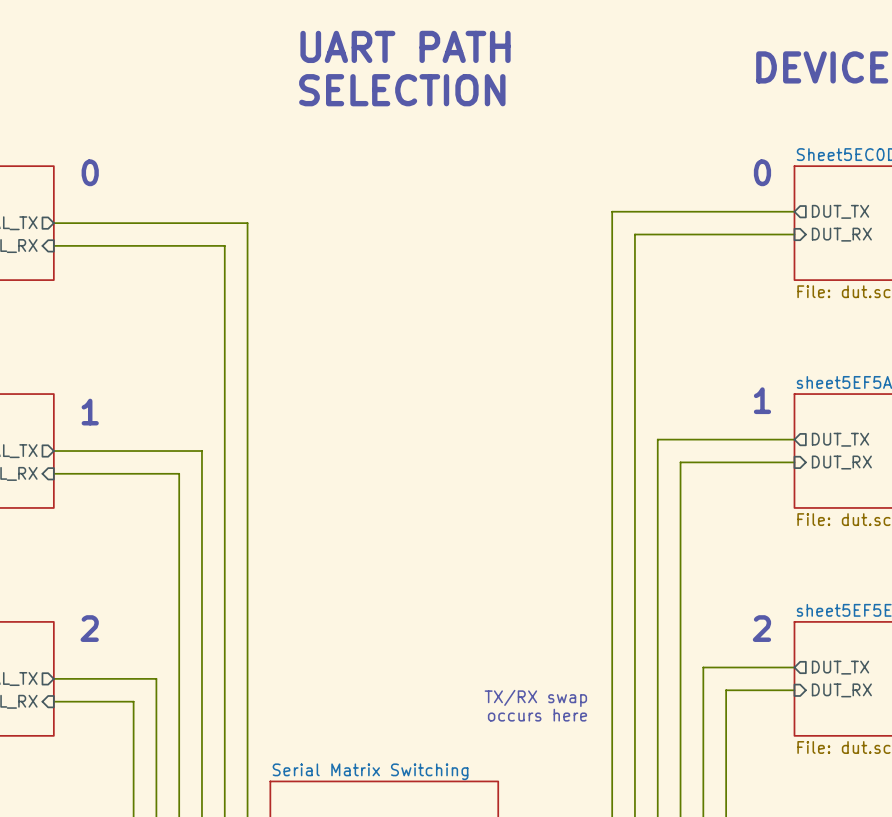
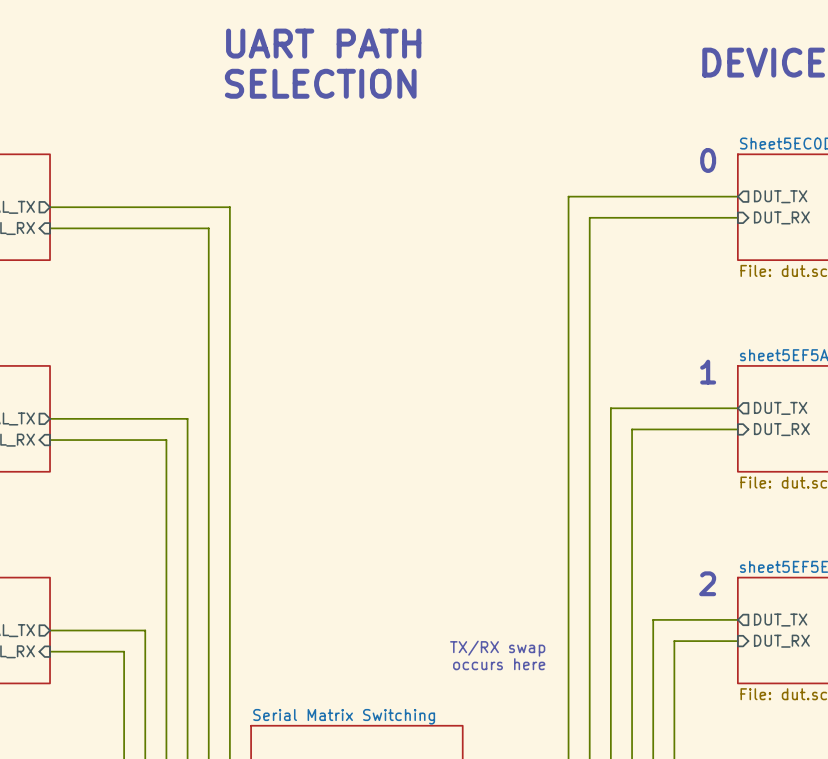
text position: UART PATH (405, 46) -> UART PATH (323, 43)
text position: SELECTION (402, 90) -> SELECTION (320, 83)
text: 0 (90, 172) -> none
text: 1 (90, 412) -> none
text: 2 (89, 628) -> none

